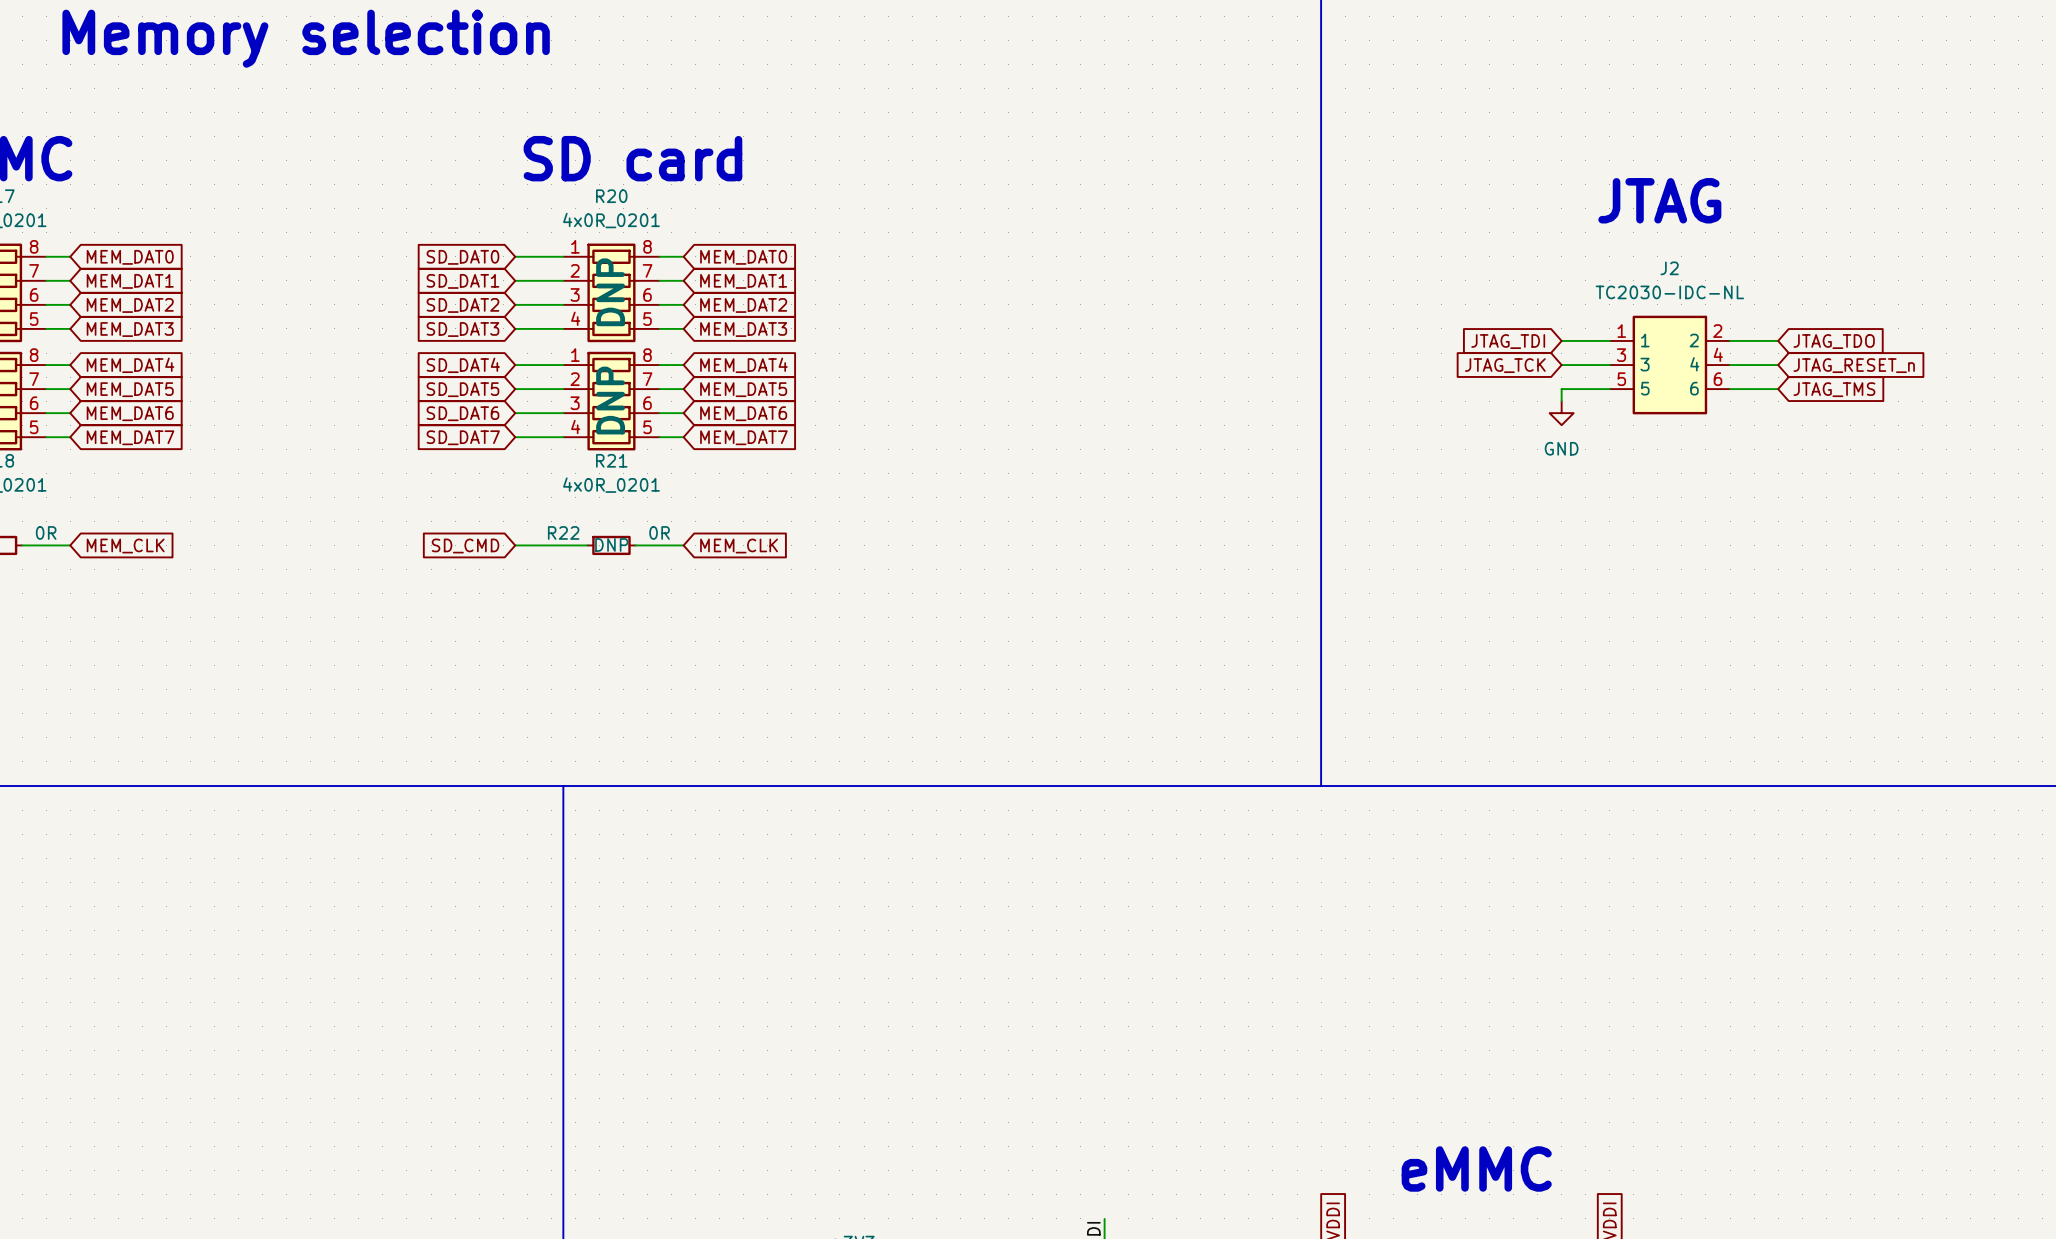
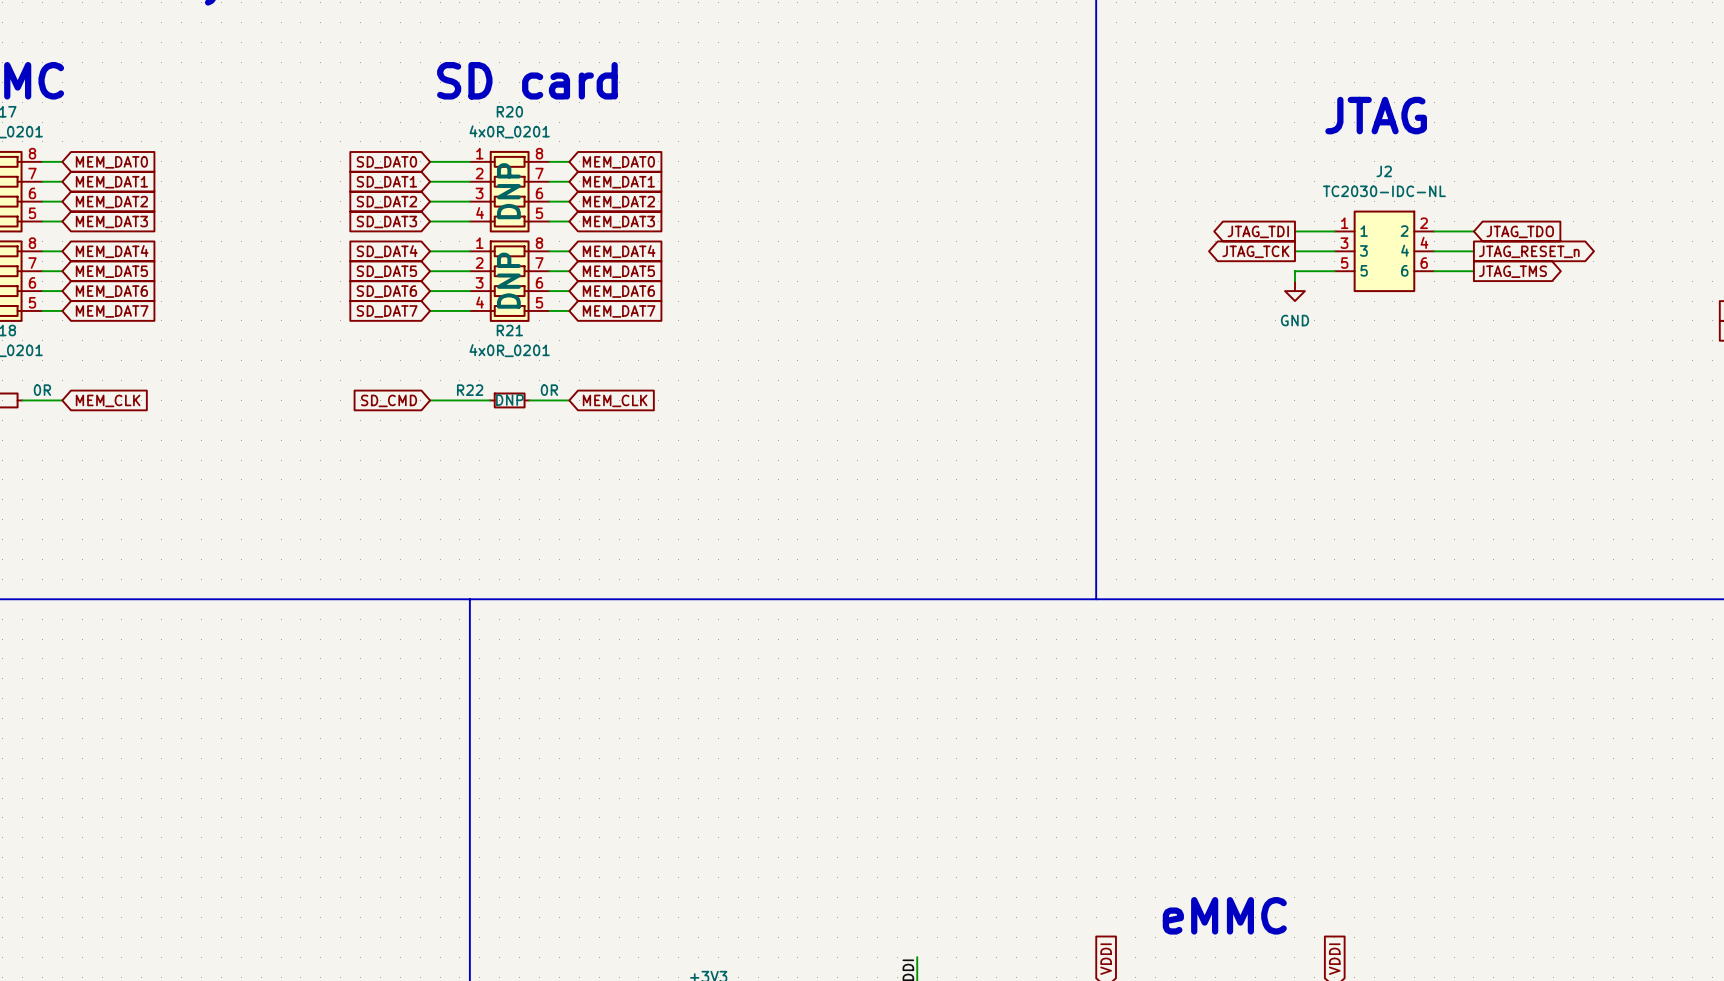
global label shape: input (1508, 341) -> output (1258, 231)
global label shape: input (1505, 365) -> output (1255, 251)
global label shape: input (1854, 365) -> output (1529, 251)
global label shape: input (1834, 389) -> output (1512, 271)

